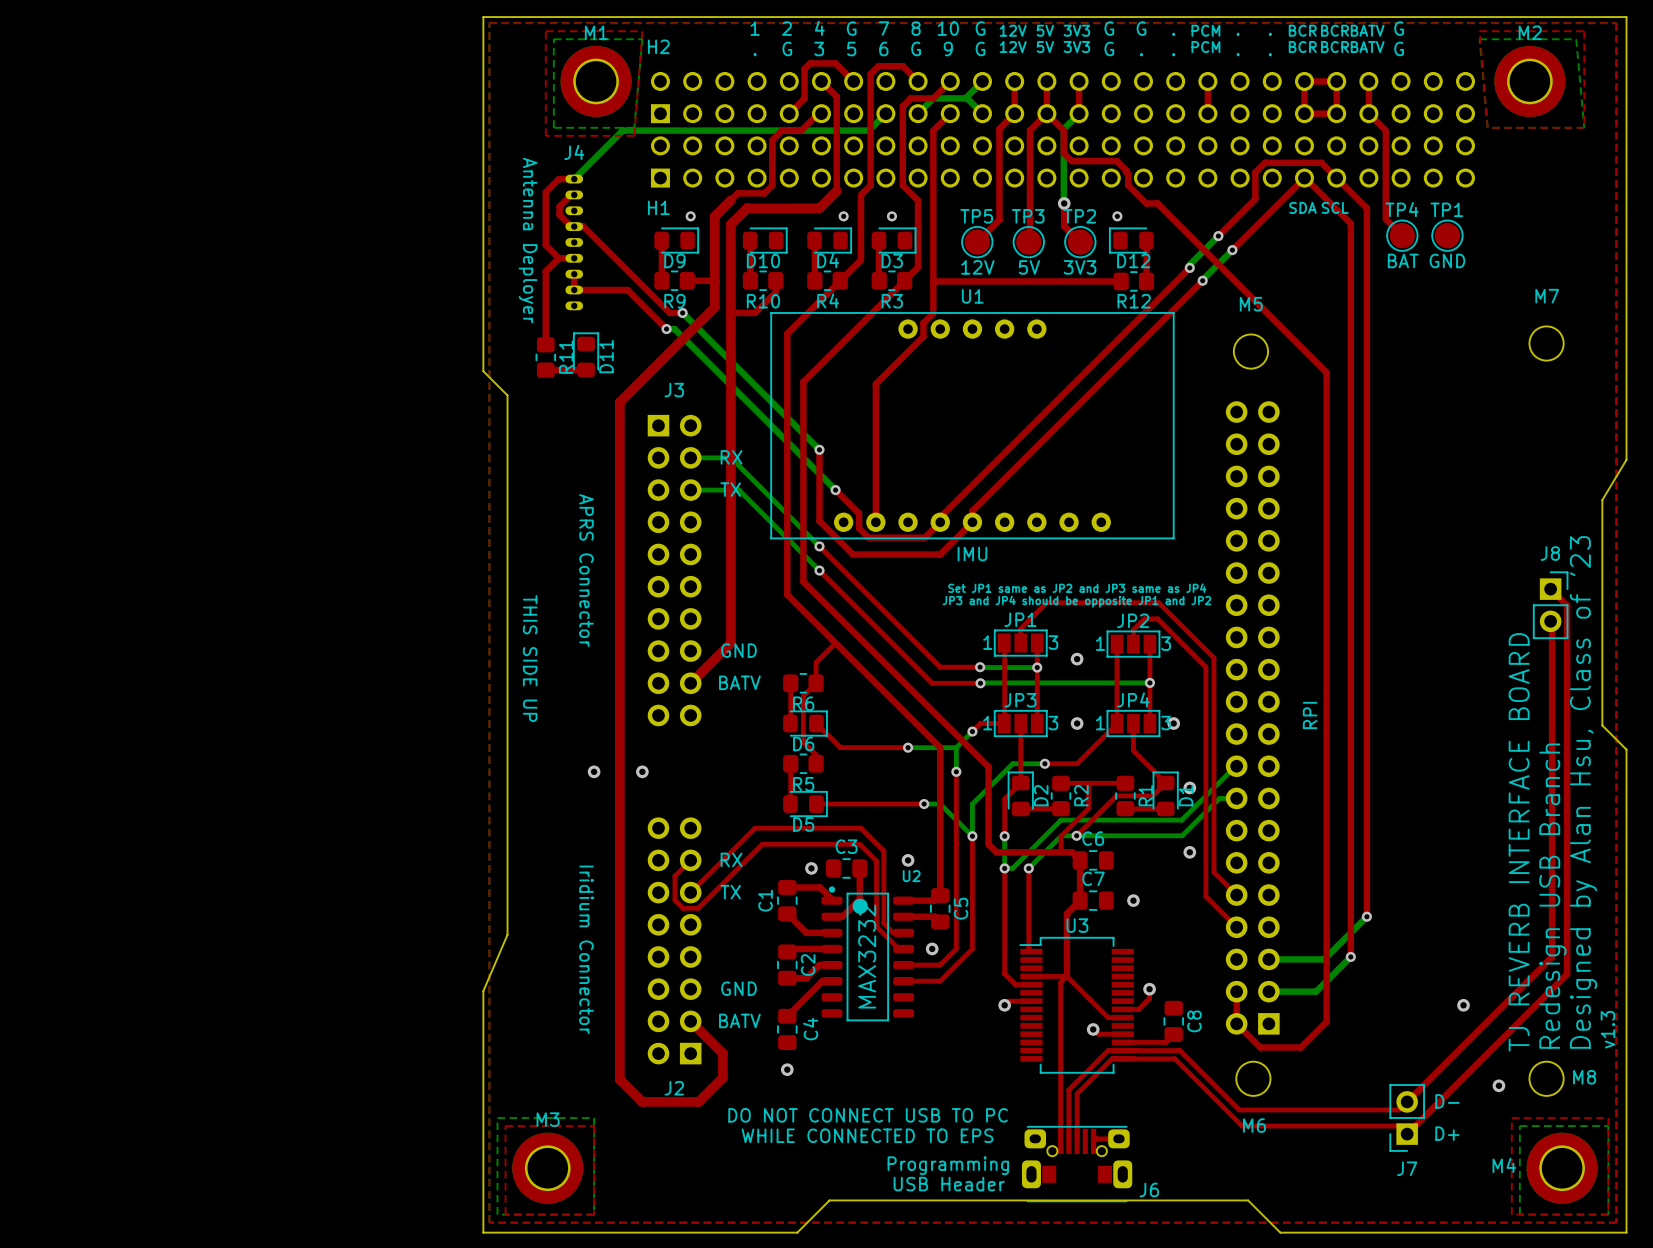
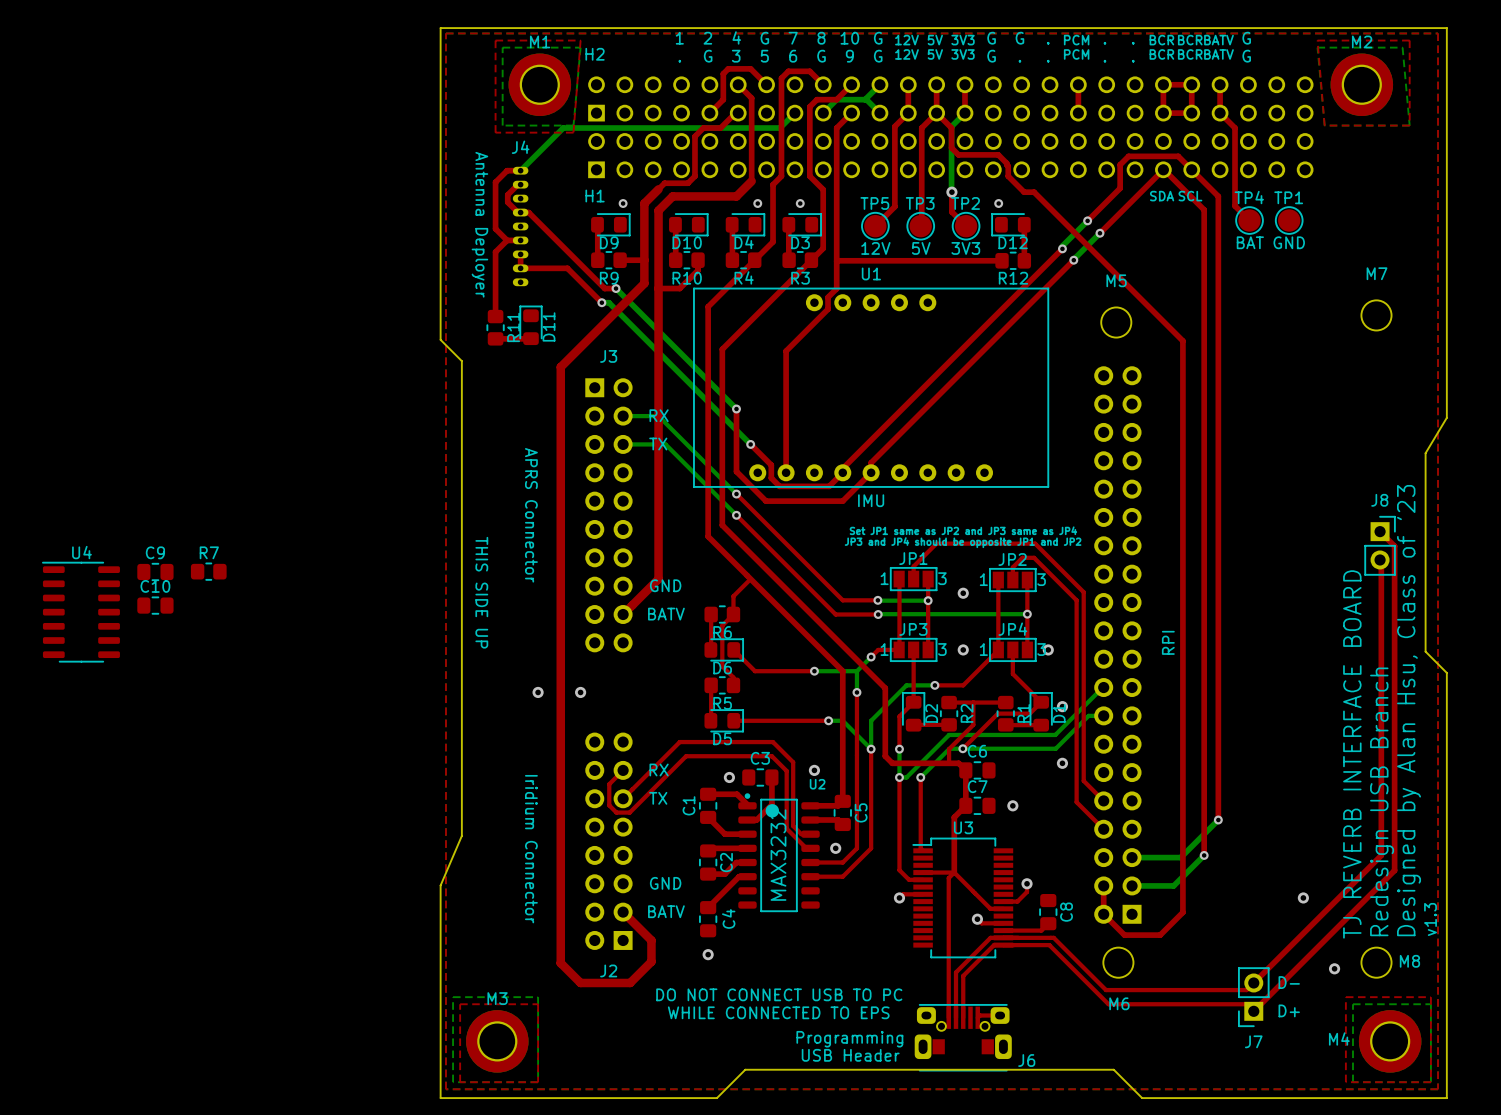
C9: none -> (155, 571)
R7: none -> (208, 571)
C10: none -> (155, 605)
U4: none -> (81, 612)

